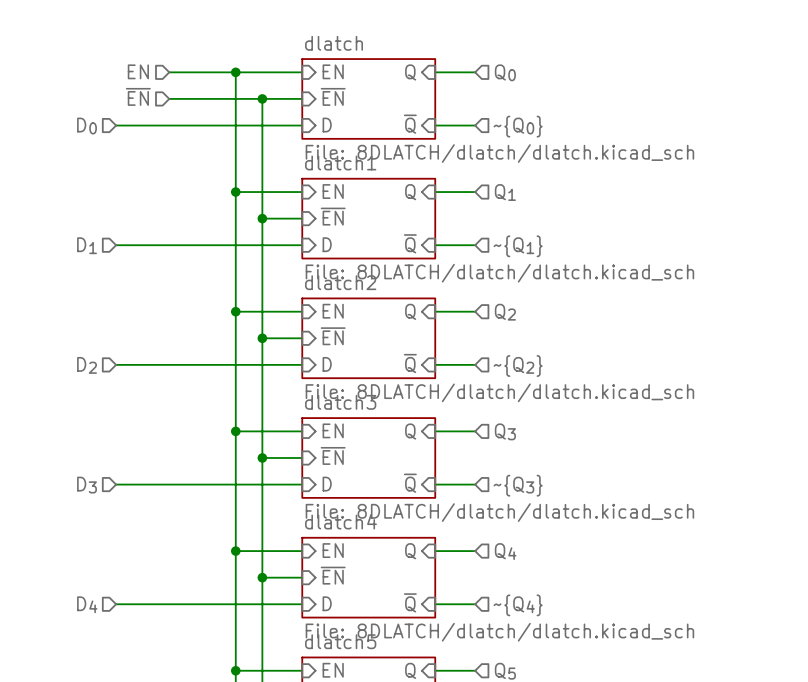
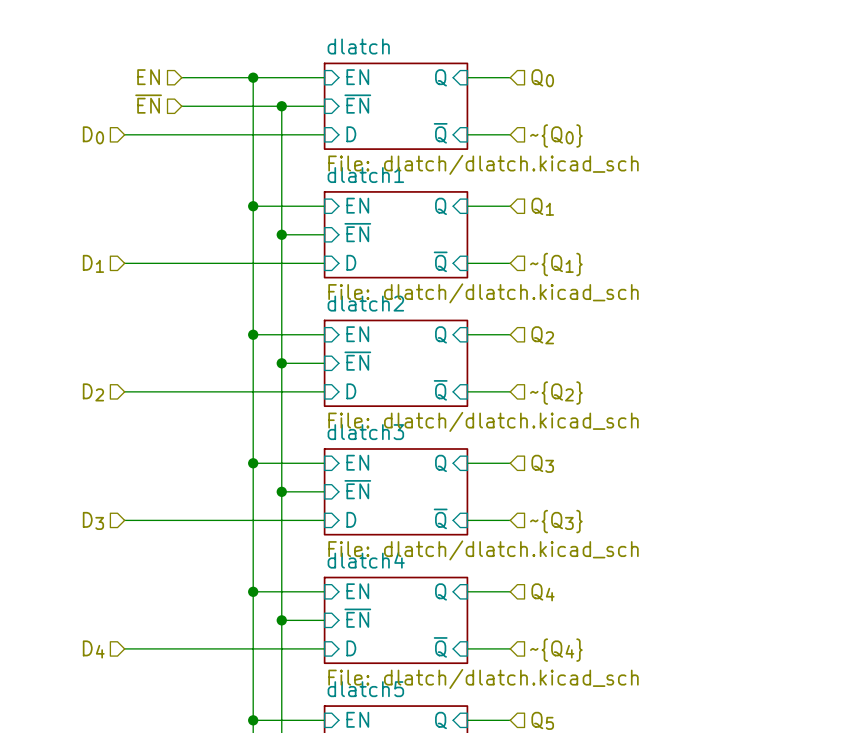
sheet dlatch value: File: 8DLATCH/dlatch/dlatch.kicad_sch (499, 153) -> File: dlatch/dlatch.kicad_sch (483, 164)
sheet dlatch1 value: File: 8DLATCH/dlatch/dlatch.kicad_sch (499, 273) -> File: dlatch/dlatch.kicad_sch (483, 293)
sheet dlatch2 value: File: 8DLATCH/dlatch/dlatch.kicad_sch (499, 392) -> File: dlatch/dlatch.kicad_sch (483, 421)
sheet dlatch3 value: File: 8DLATCH/dlatch/dlatch.kicad_sch (499, 512) -> File: dlatch/dlatch.kicad_sch (483, 550)
sheet dlatch4 value: File: 8DLATCH/dlatch/dlatch.kicad_sch (499, 632) -> File: dlatch/dlatch.kicad_sch (483, 678)

